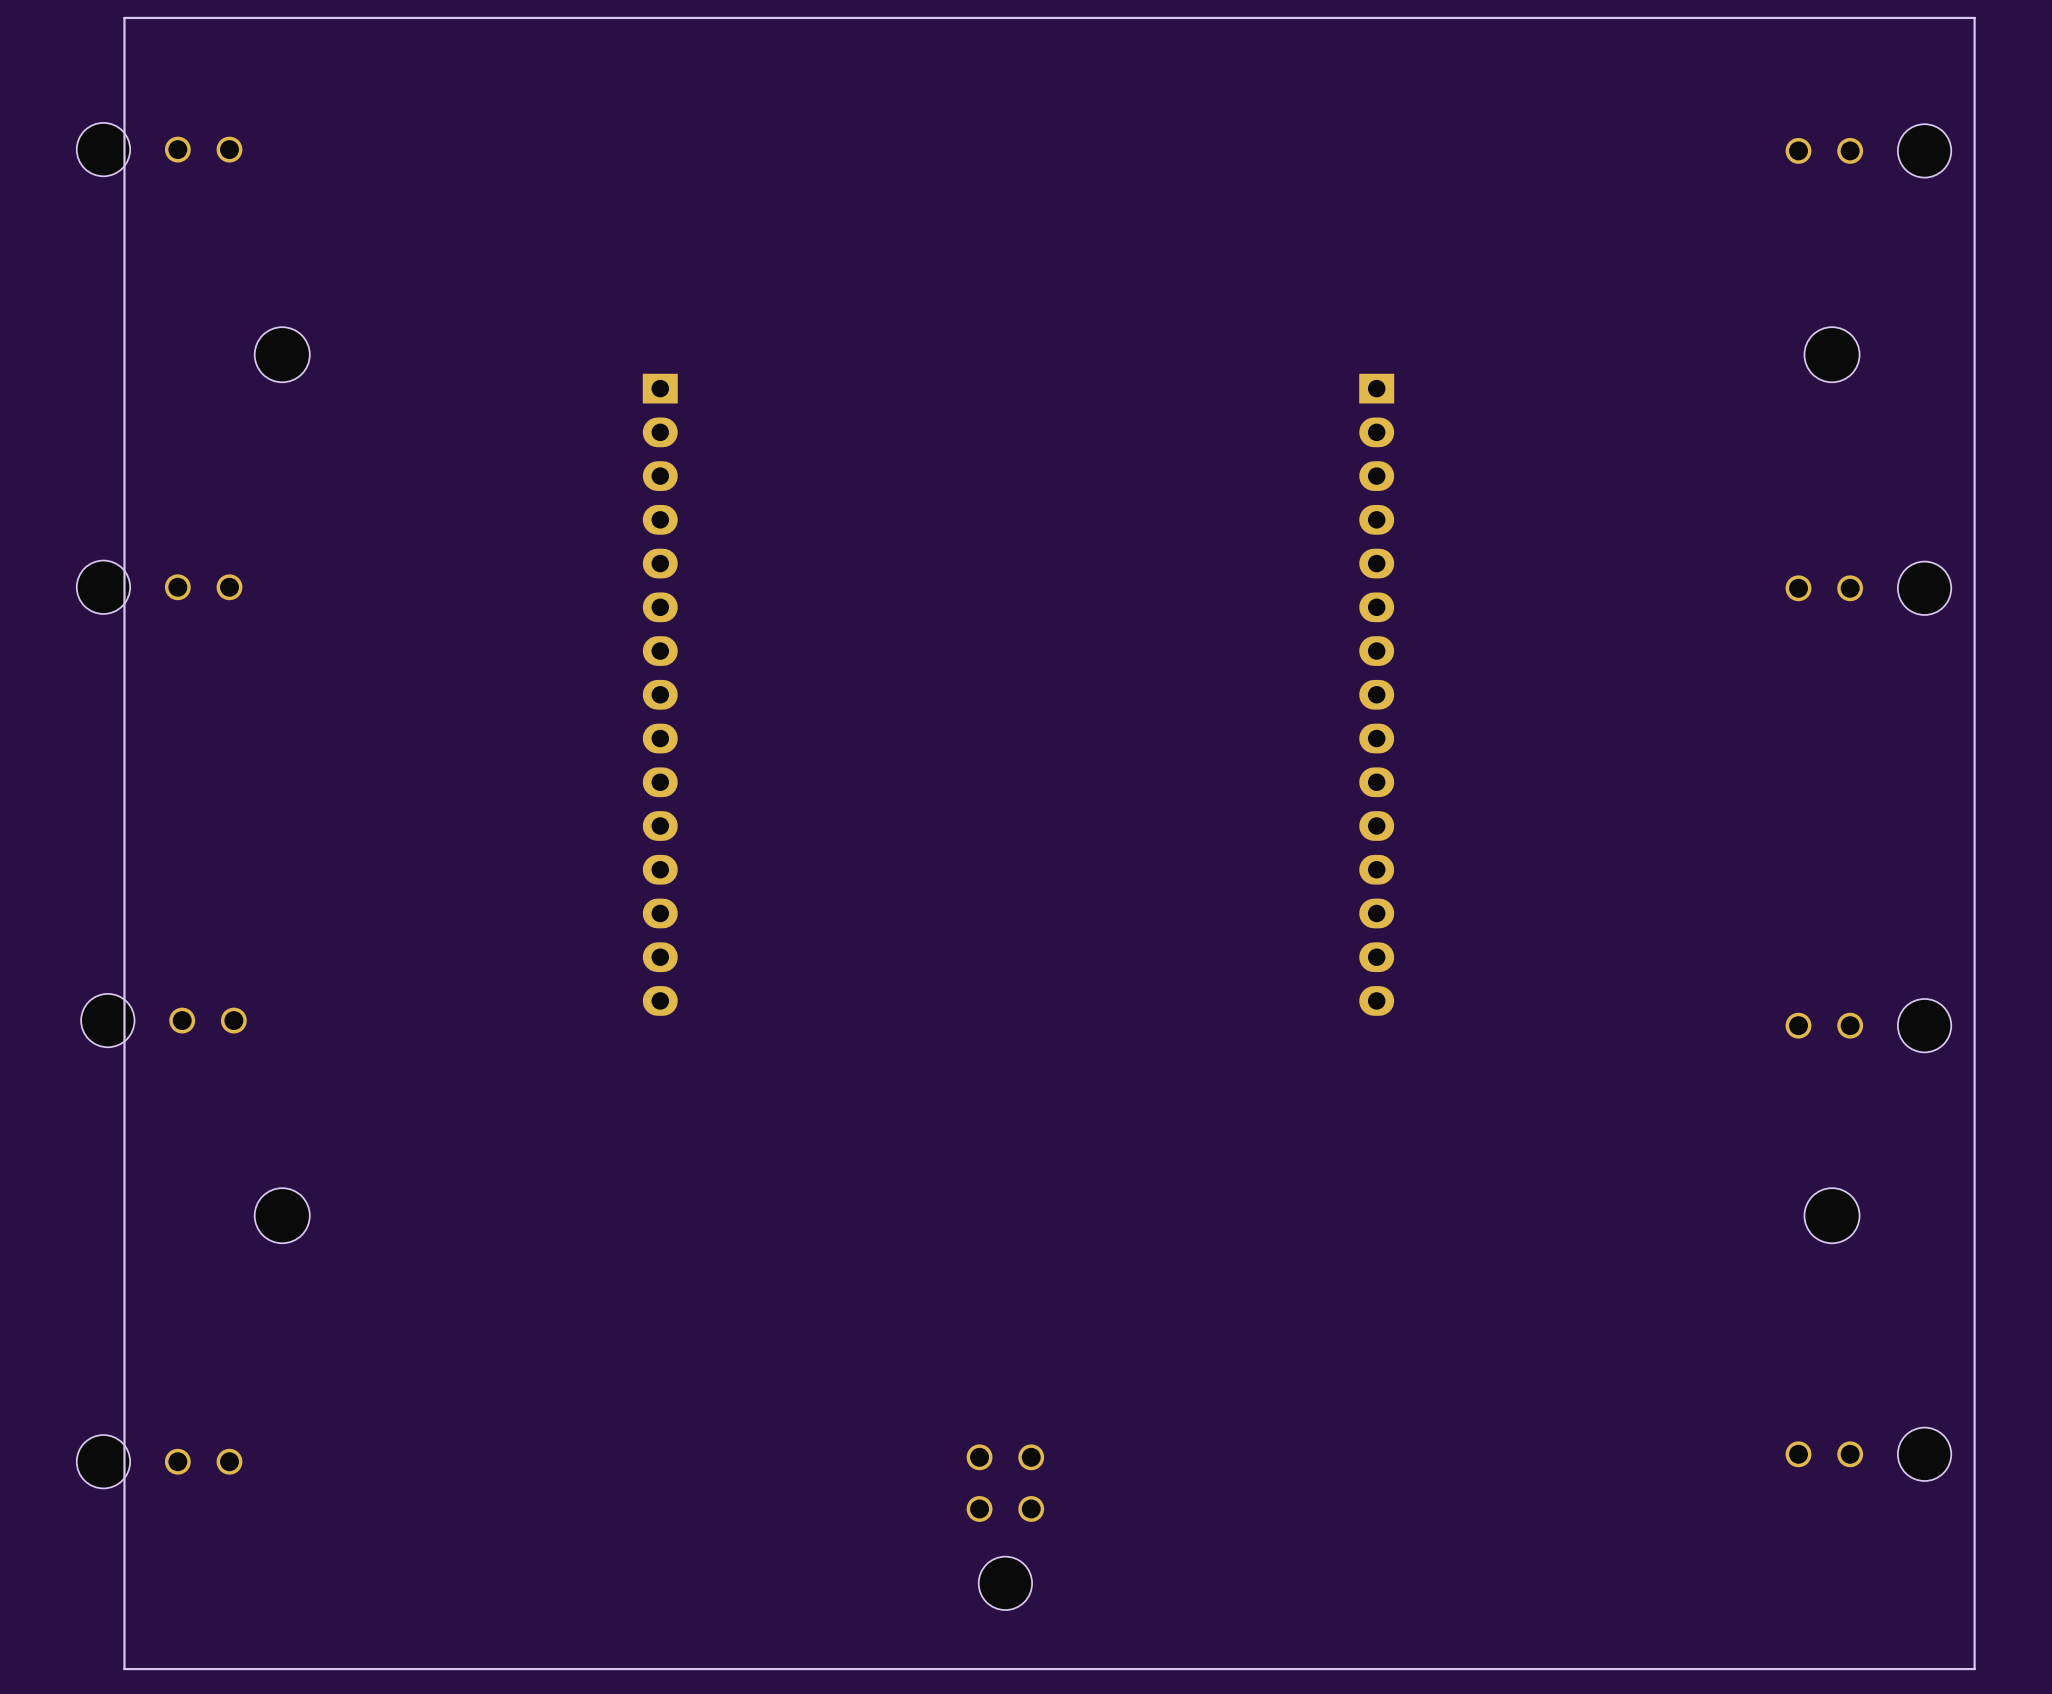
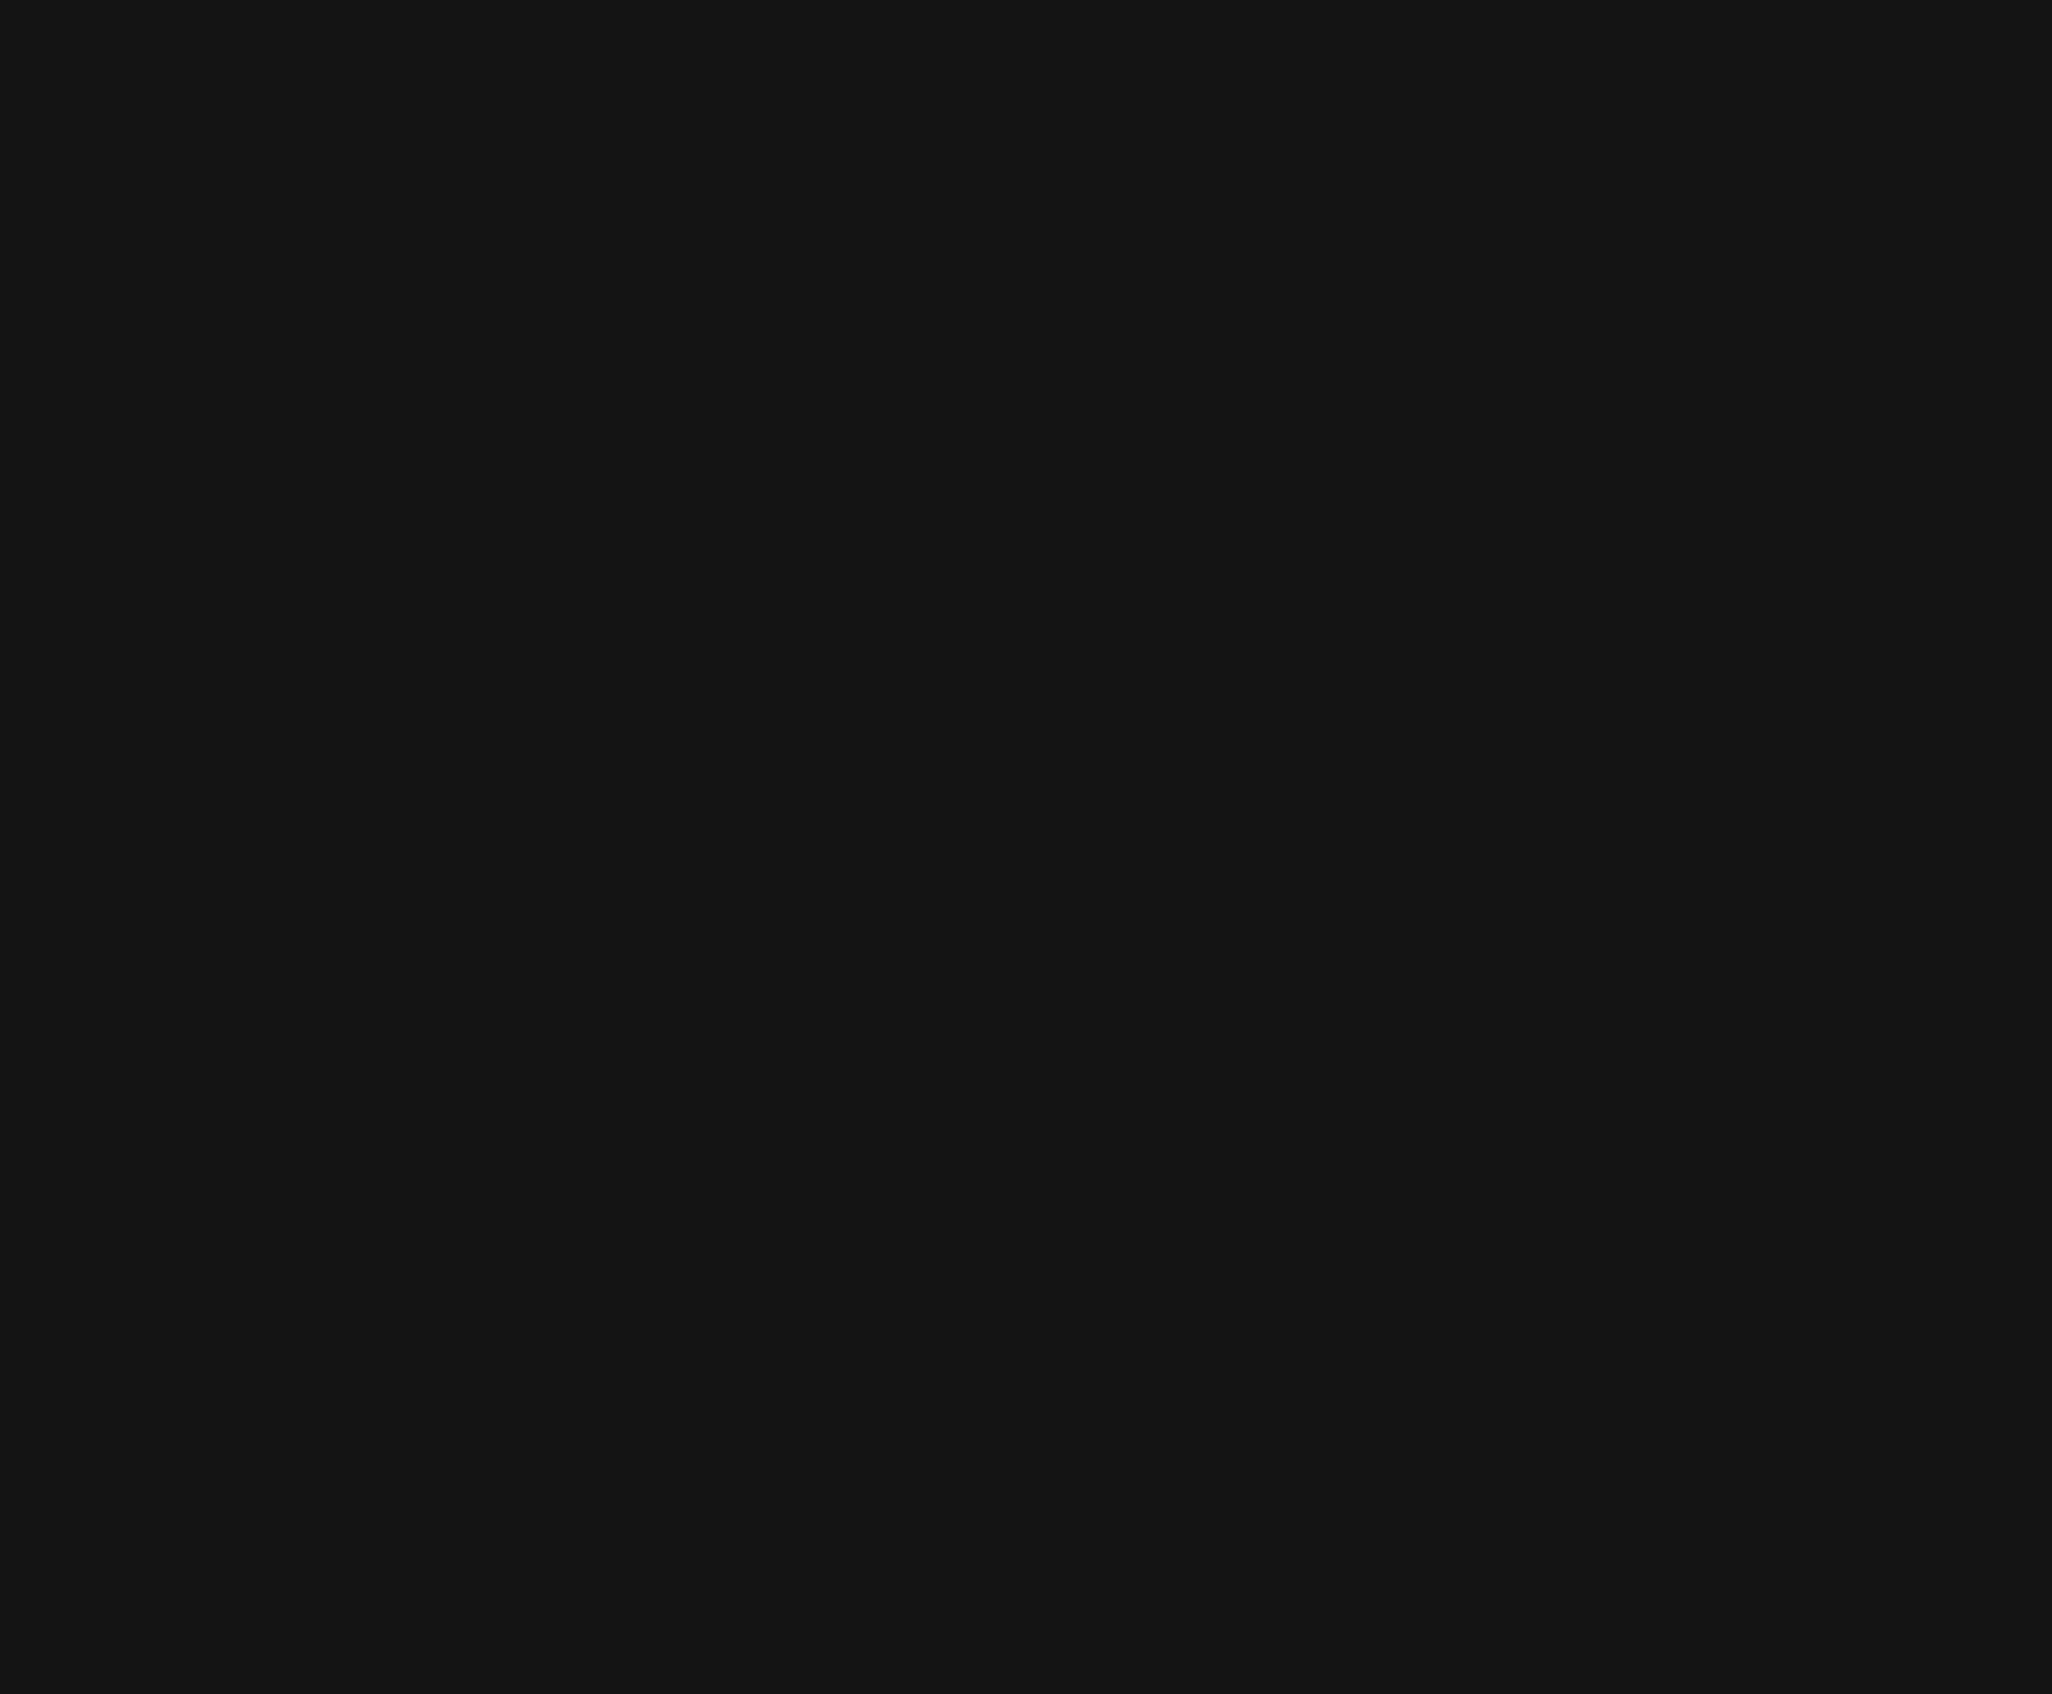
board edge: (1974, 17) (124, 17) (124, 1669) (1974, 1669) (1974, 17) -> none
part: (159, 149) -> none
part: (1868, 150) -> none
part: (282, 354) -> none
part: (1832, 354) -> none
part: (159, 587) -> none
part: (1868, 588) -> none
part: (660, 694) -> none
part: (1376, 694) -> none
part: (163, 1020) -> none
part: (1868, 1025) -> none
part: (282, 1215) -> none
part: (1832, 1215) -> none
part: (1868, 1454) -> none
part: (159, 1461) -> none
part: (1005, 1527) -> none

